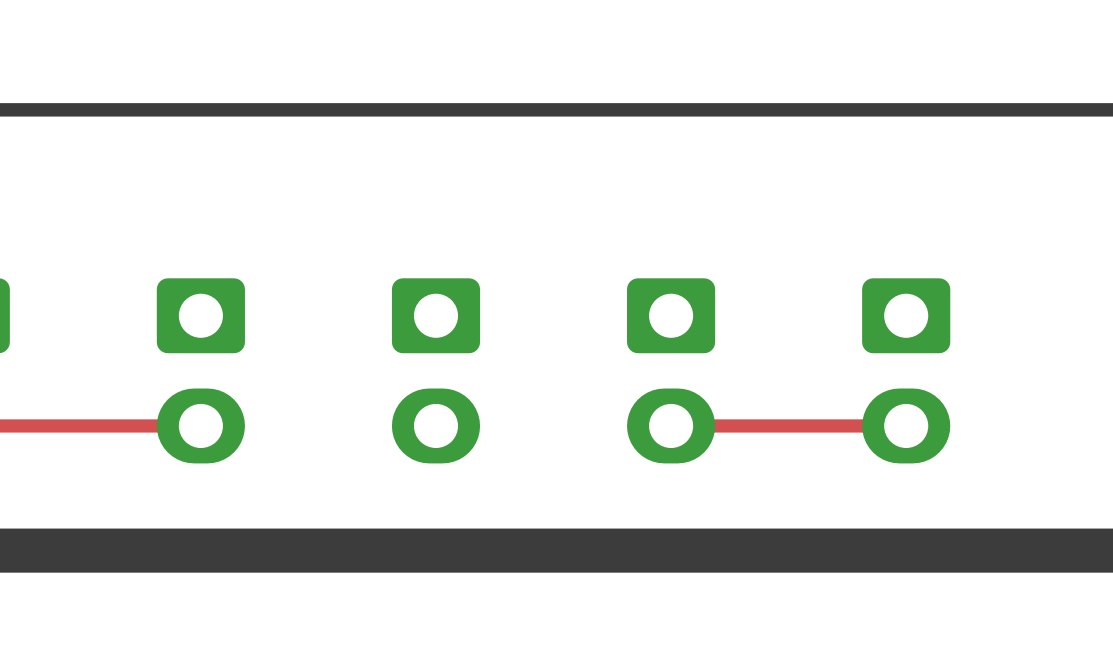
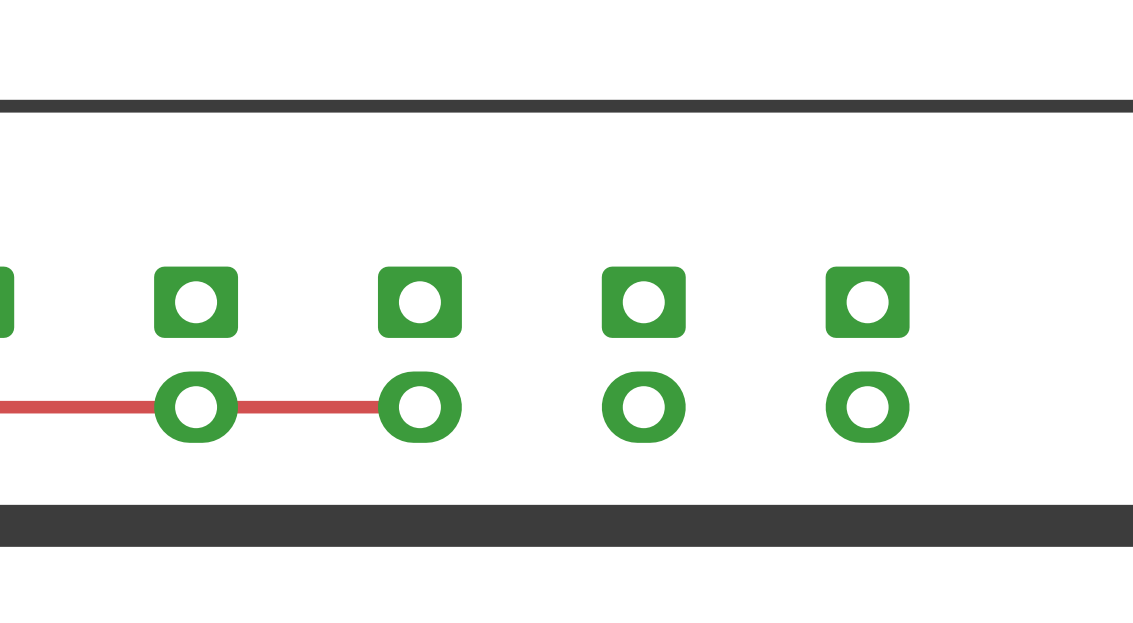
track: (671, 425) (906, 425) -> (196, 407) (419, 407)

